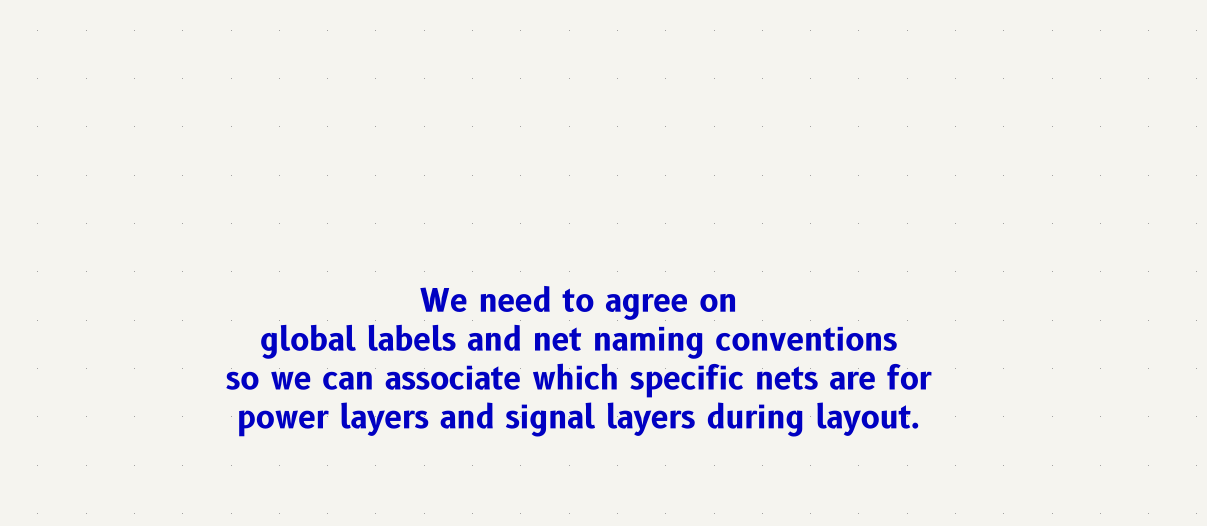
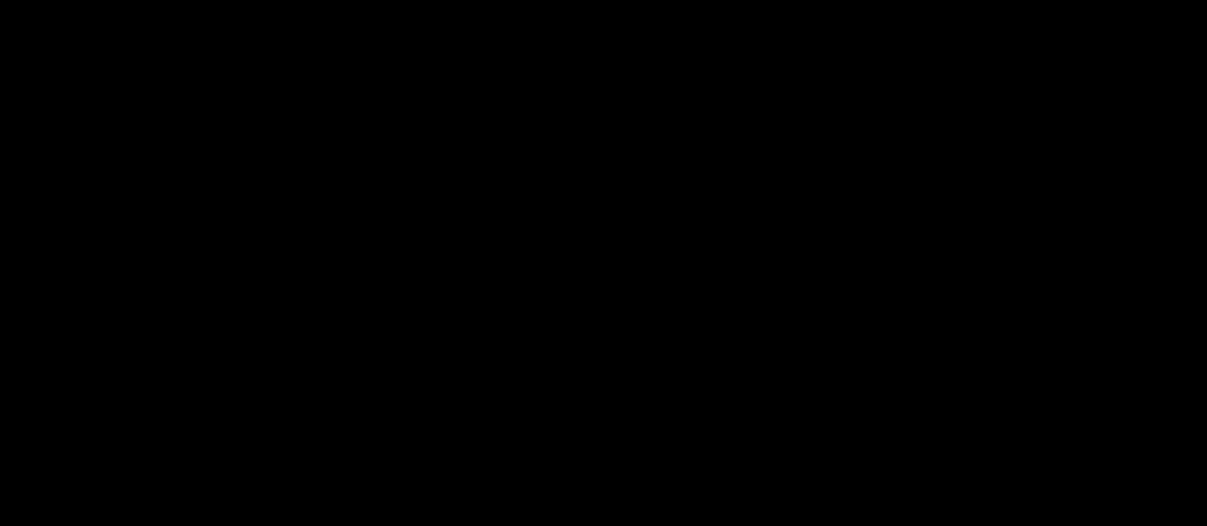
text: We need to agree on (577, 302) -> none
text: global labels and net naming conventions (578, 341) -> none
text: so we can associate which specific nets are for (578, 380) -> none
text: power layers and signal layers during layout. (578, 419) -> none

